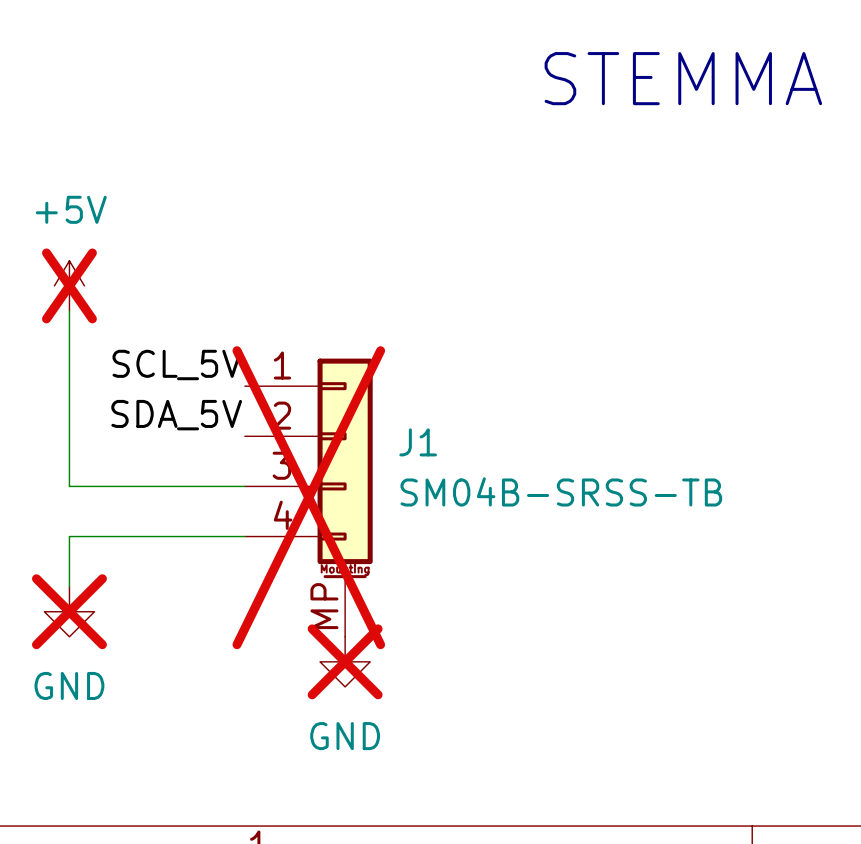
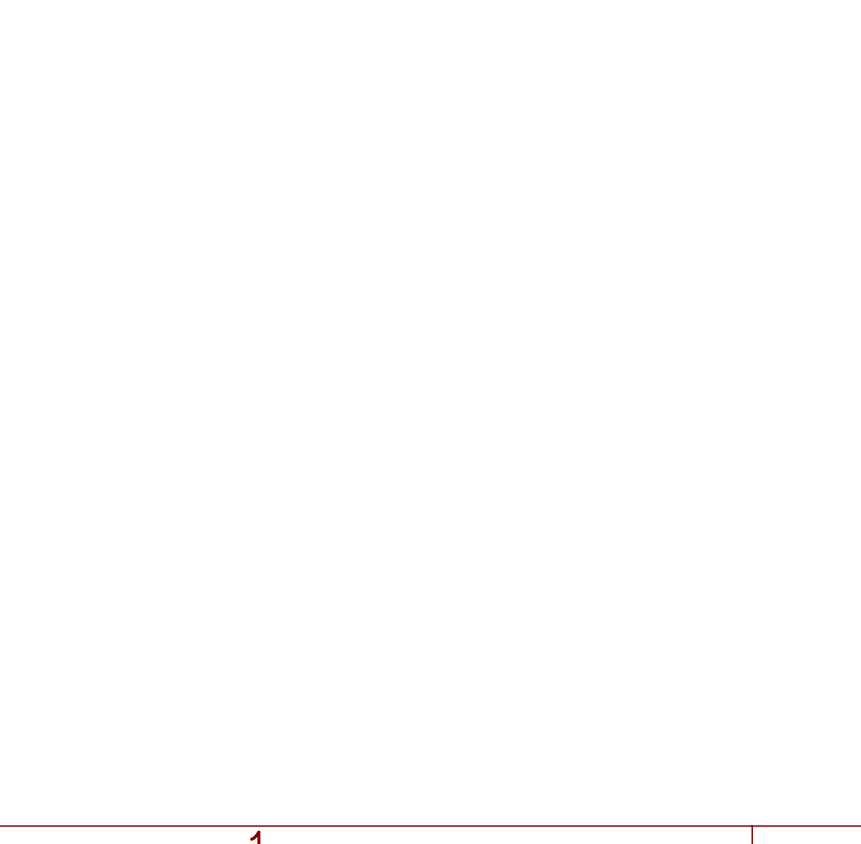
text: STEMMA (683, 78) -> none
power symbol: +5V (69, 285) -> none
wire: (69, 310) (69, 486) (244, 486) -> none
label: SCL_5V (177, 365) -> none
label: SDA_5V (176, 415) -> none
J1: SM04B-SRSS-TB (308, 497) -> none
wire: (244, 536) (69, 536) (69, 586) -> none
power symbol: GND (69, 611) -> none
power symbol: GND (345, 661) -> none

